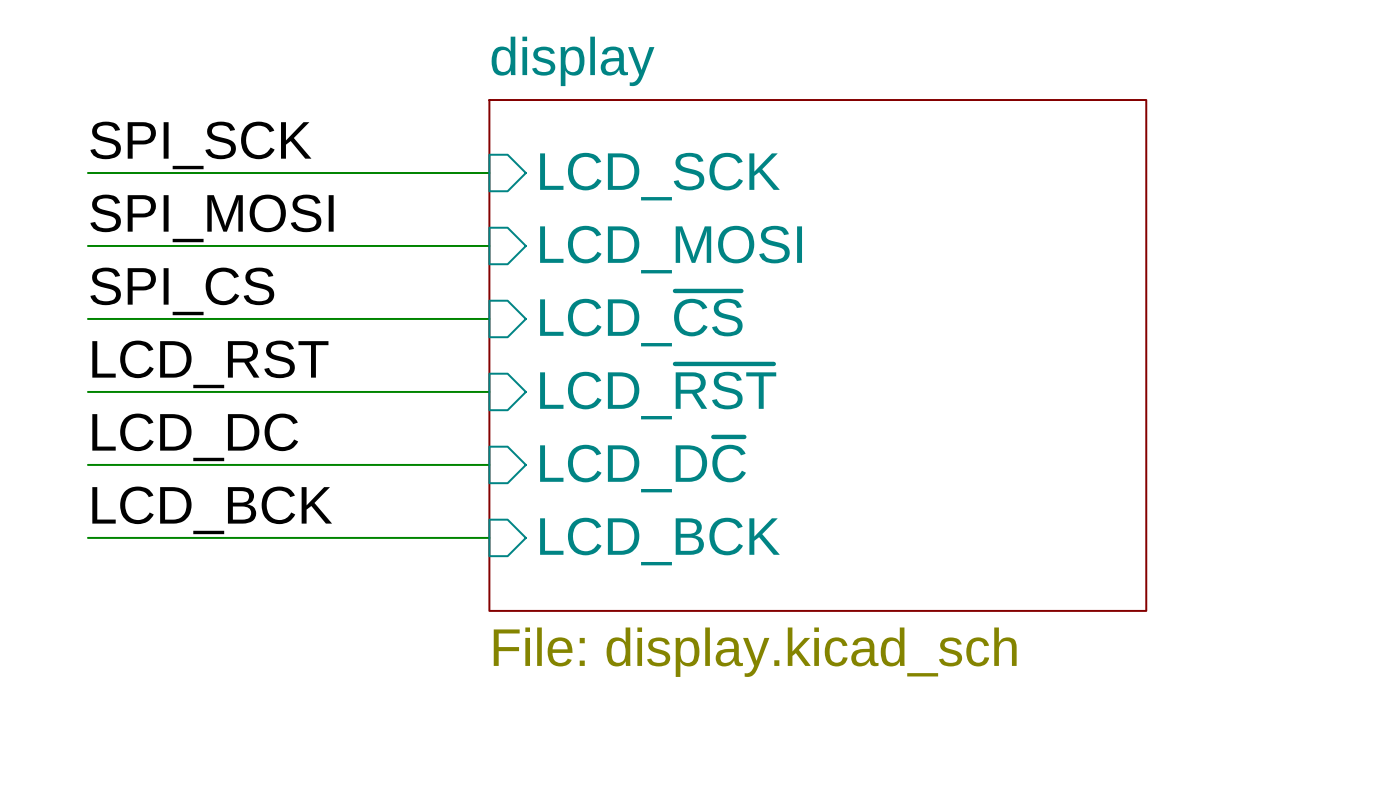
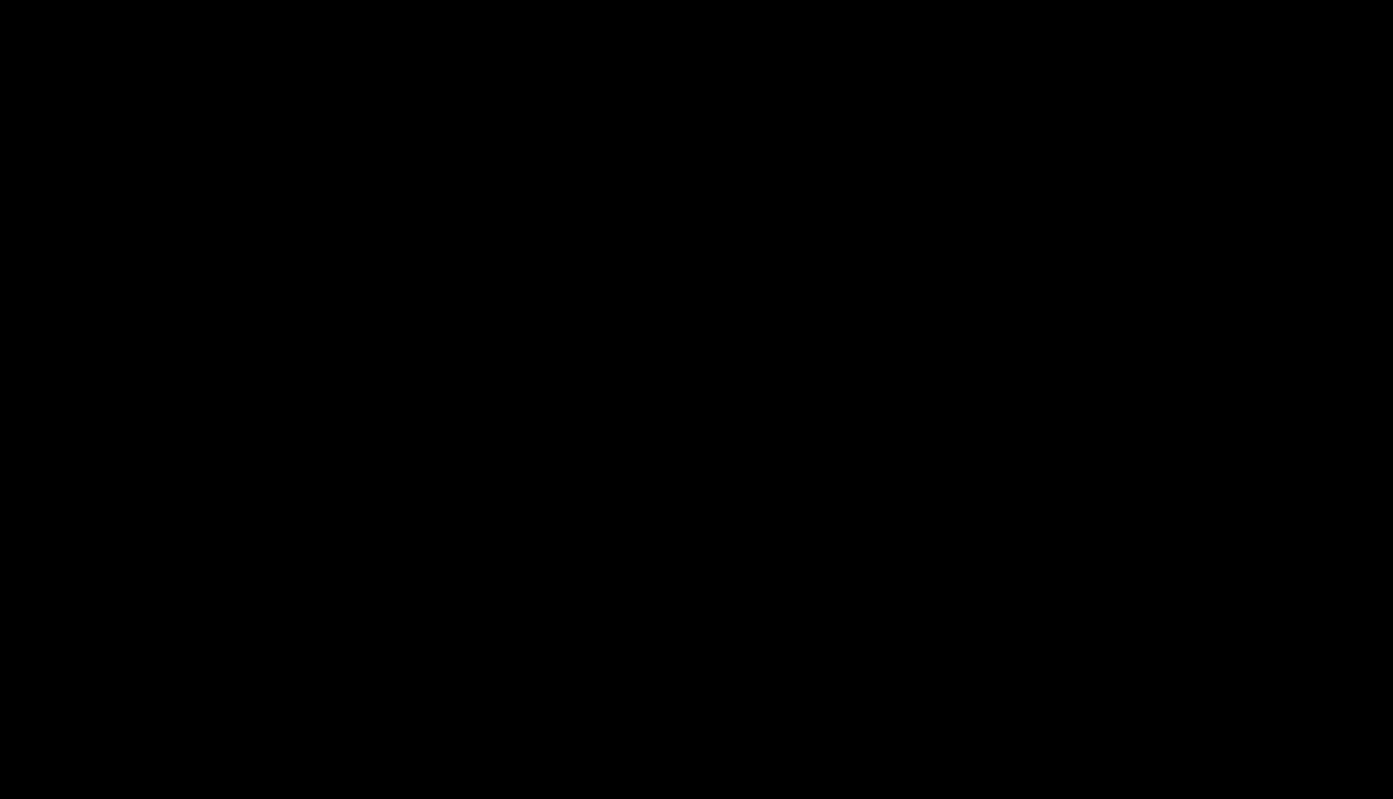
label: SPI_SCK (200, 145) -> none
wire: (87, 172) (489, 172) -> none
sheet pin: LCD_SCK (659, 176) -> none
label: SPI_MOSI (212, 218) -> none
wire: (87, 245) (489, 245) -> none
sheet pin: LCD_MOSI (671, 249) -> none
label: SPI_CS (182, 291) -> none
wire: (87, 318) (489, 318) -> none
sheet pin: LCD_~{CS} (641, 318) -> none
sheet display: File: display.kicad_sch (817, 355) -> none
label: LCD_RST (210, 364) -> none
wire: (87, 391) (489, 391) -> none
sheet pin: LCD_~{RST} (658, 391) -> none
label: LCD_DC (195, 437) -> none
wire: (87, 464) (489, 464) -> none
sheet pin: LCD_D~{C} (643, 464) -> none
label: LCD_BCK (212, 510) -> none
wire: (87, 537) (489, 537) -> none
sheet pin: LCD_BCK (659, 541) -> none

